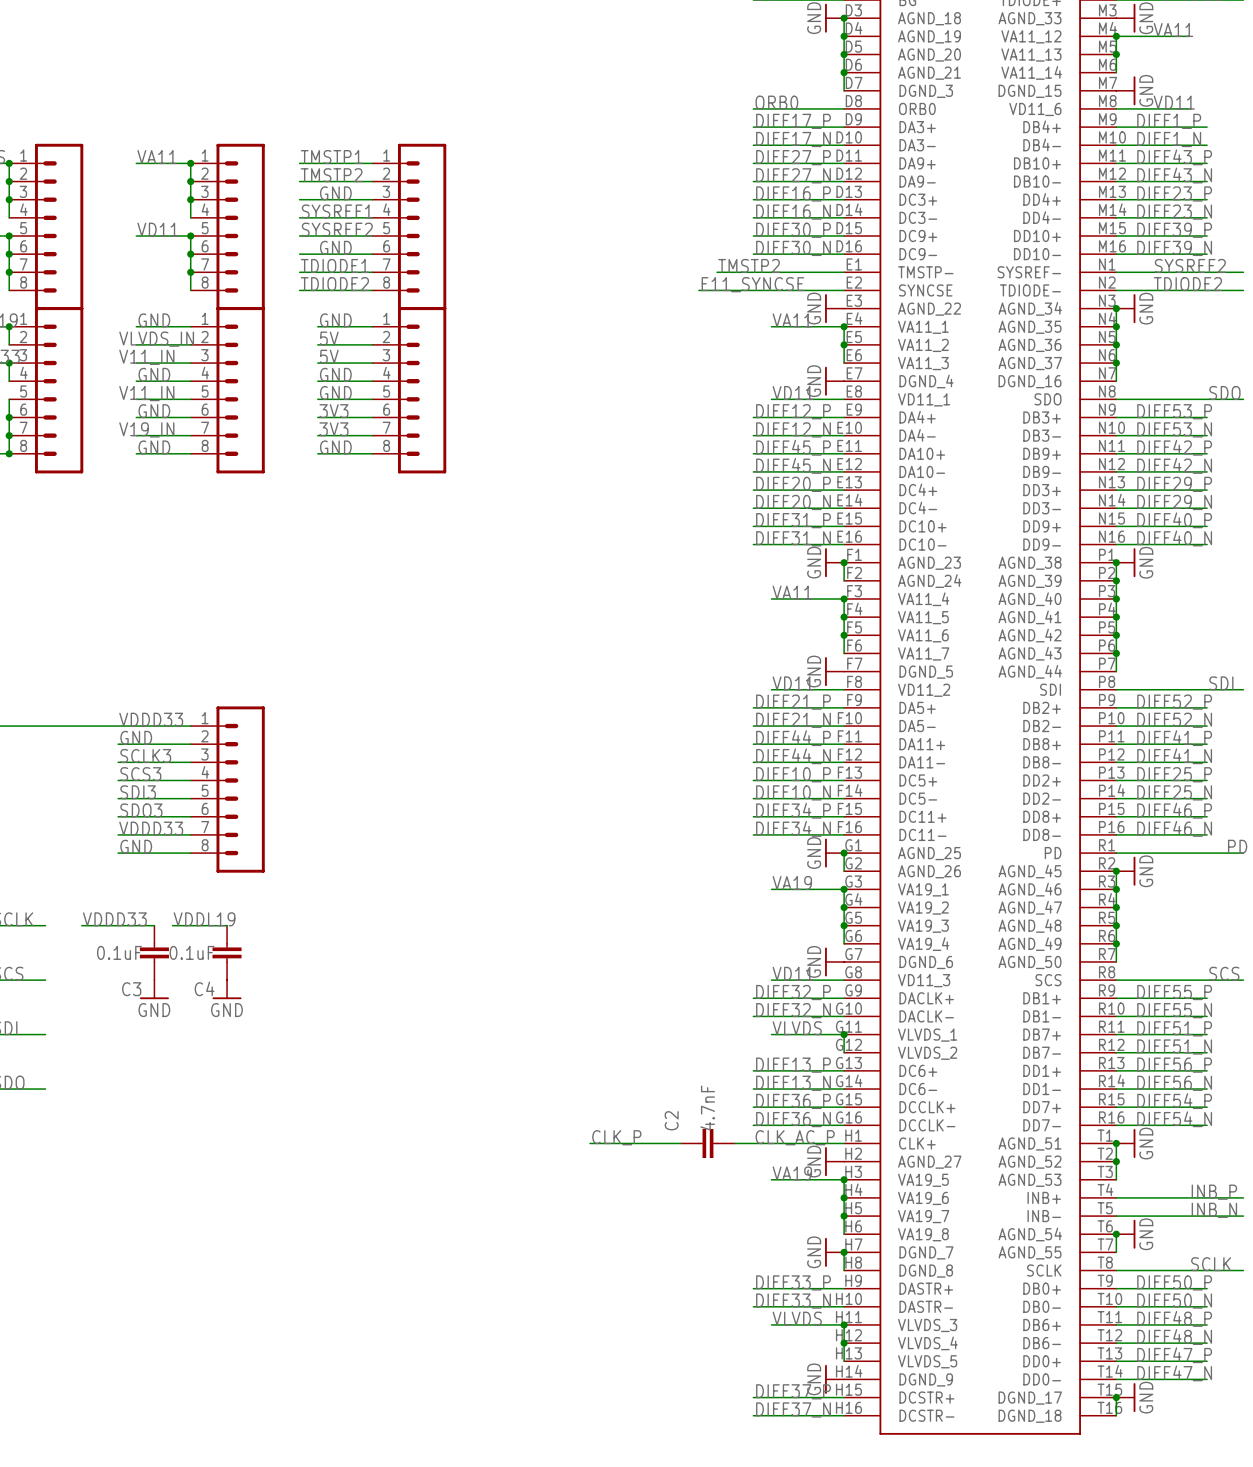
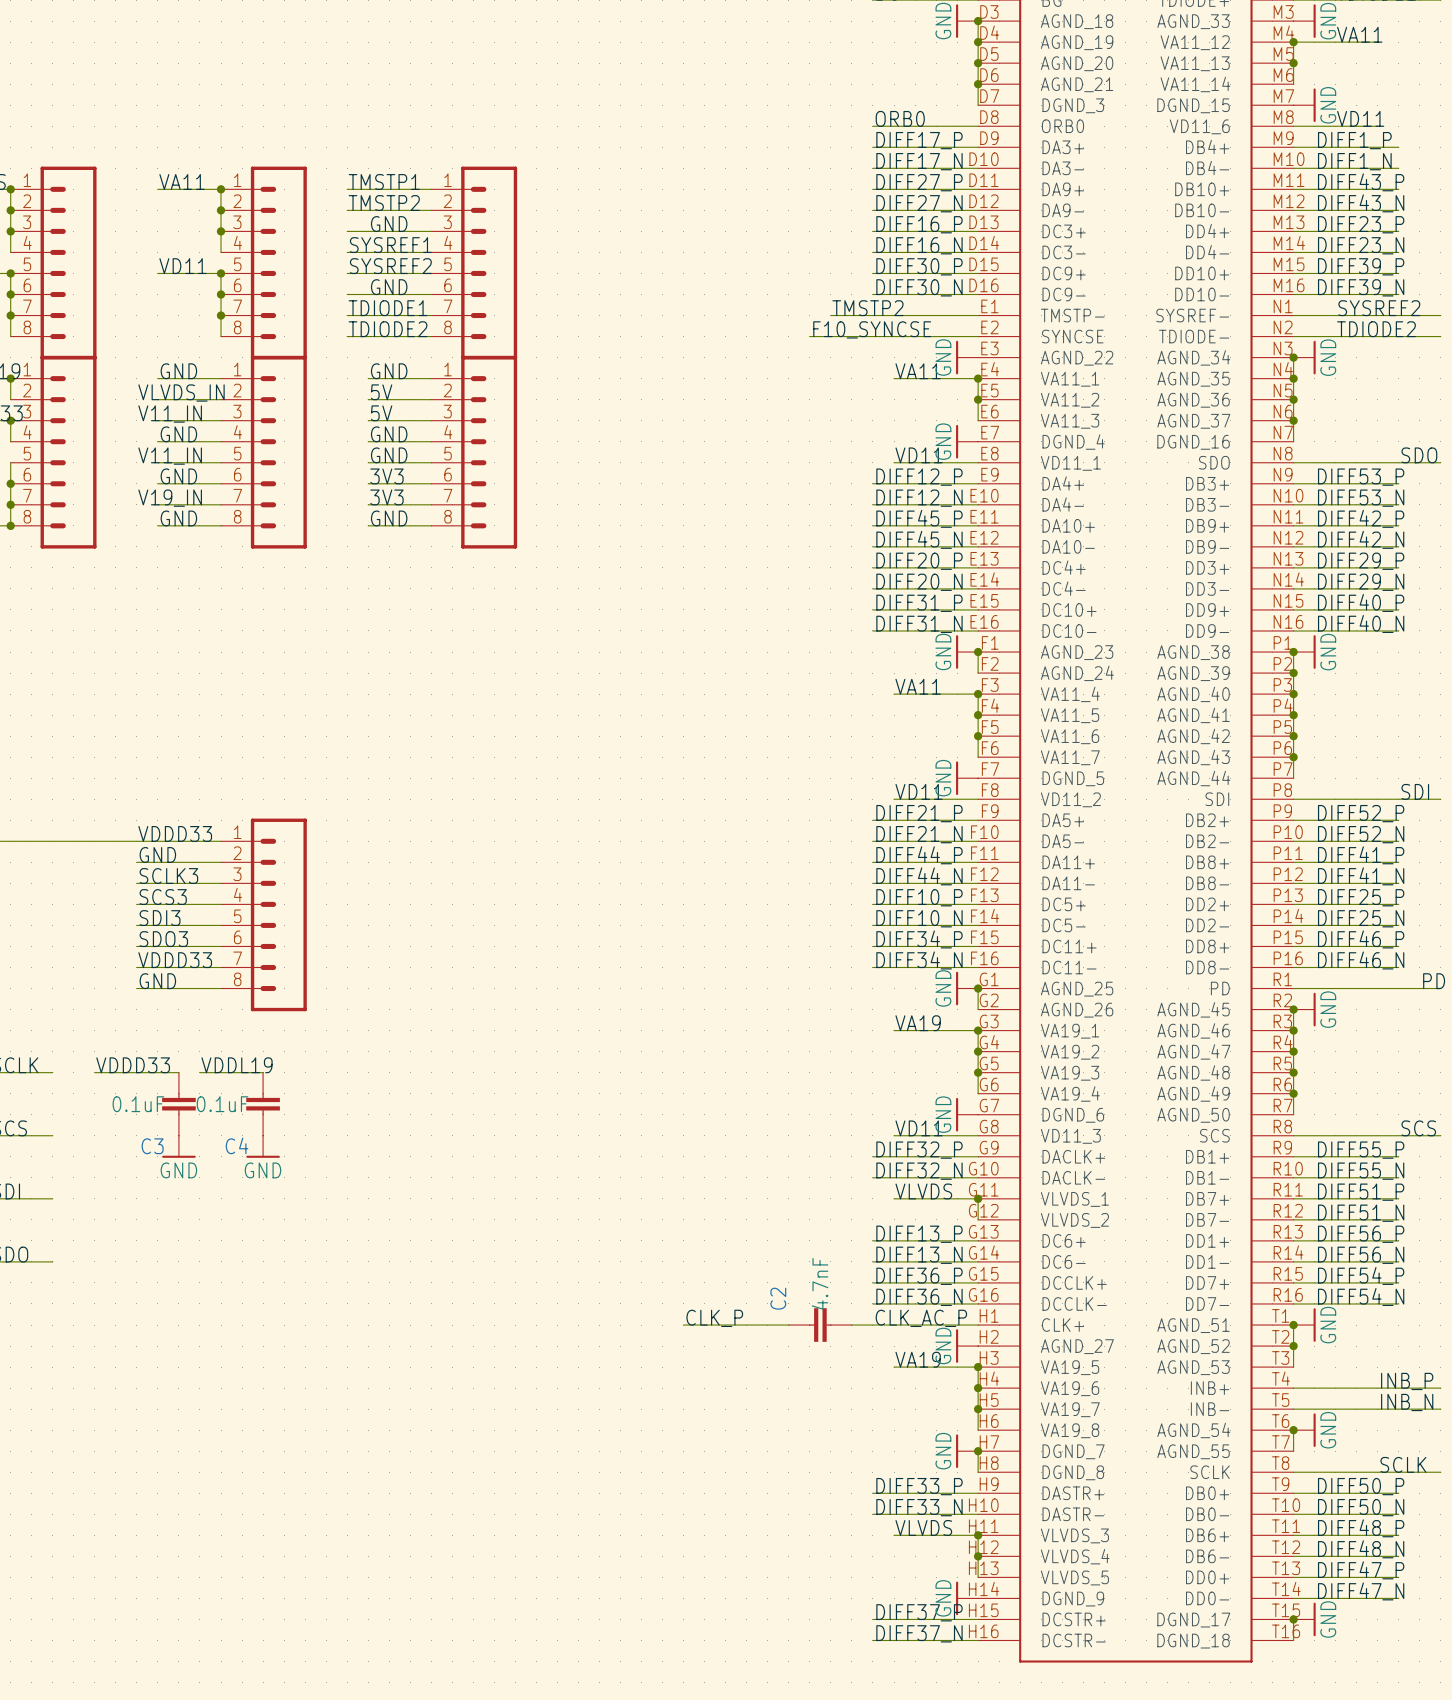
label: E11_SYNCSE (752, 284) -> F10_SYNCSE (872, 329)

